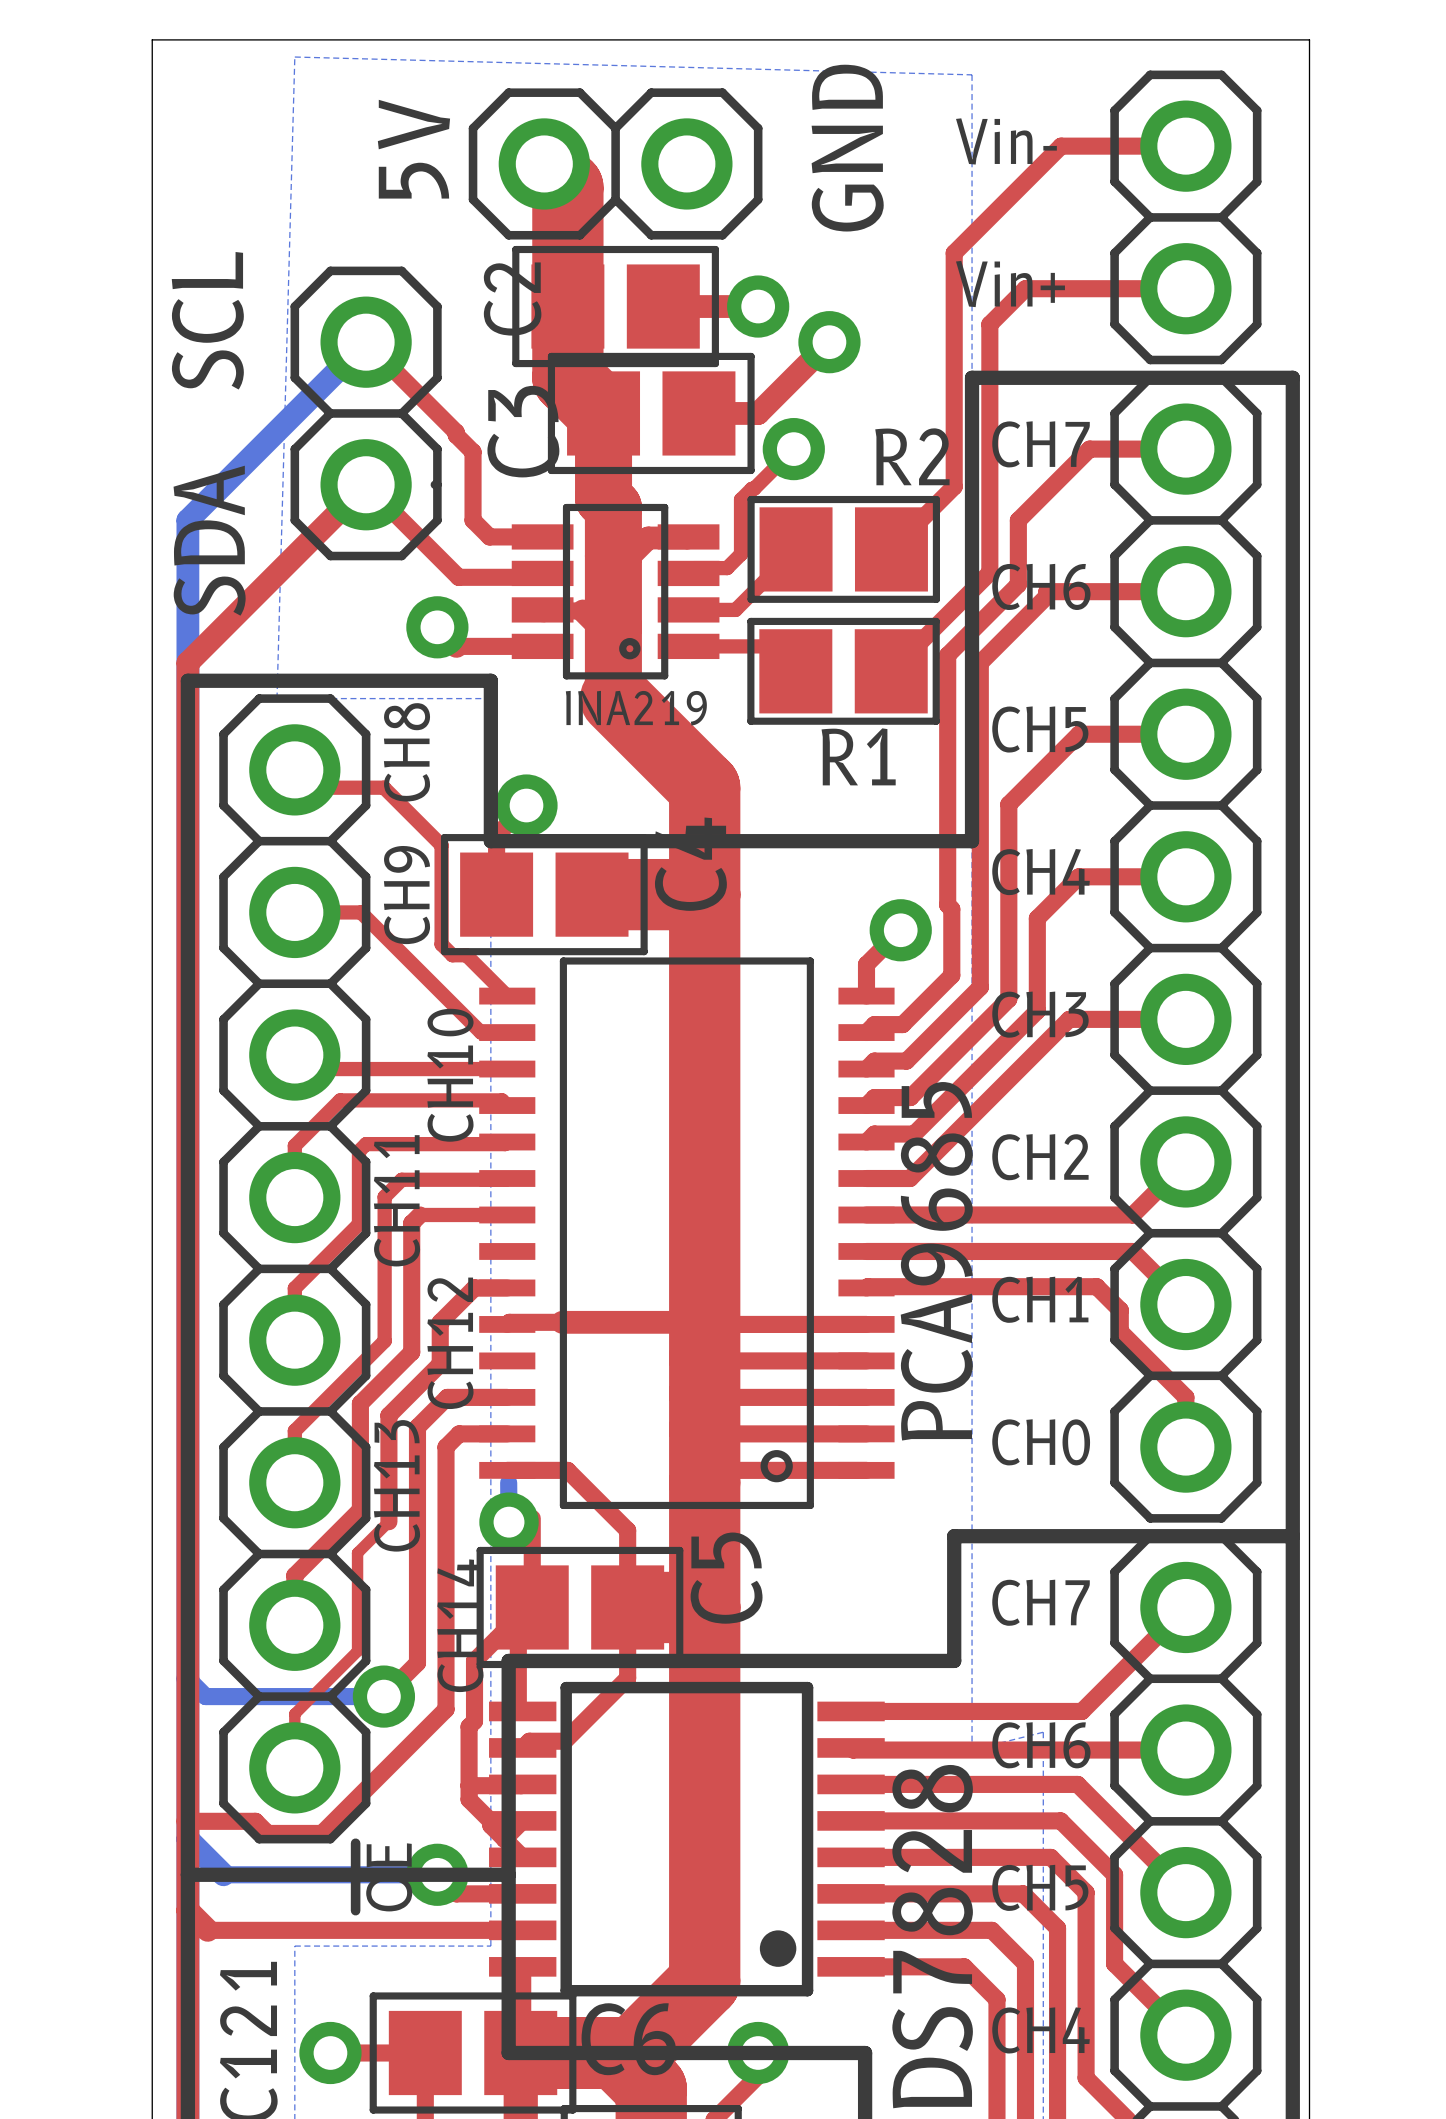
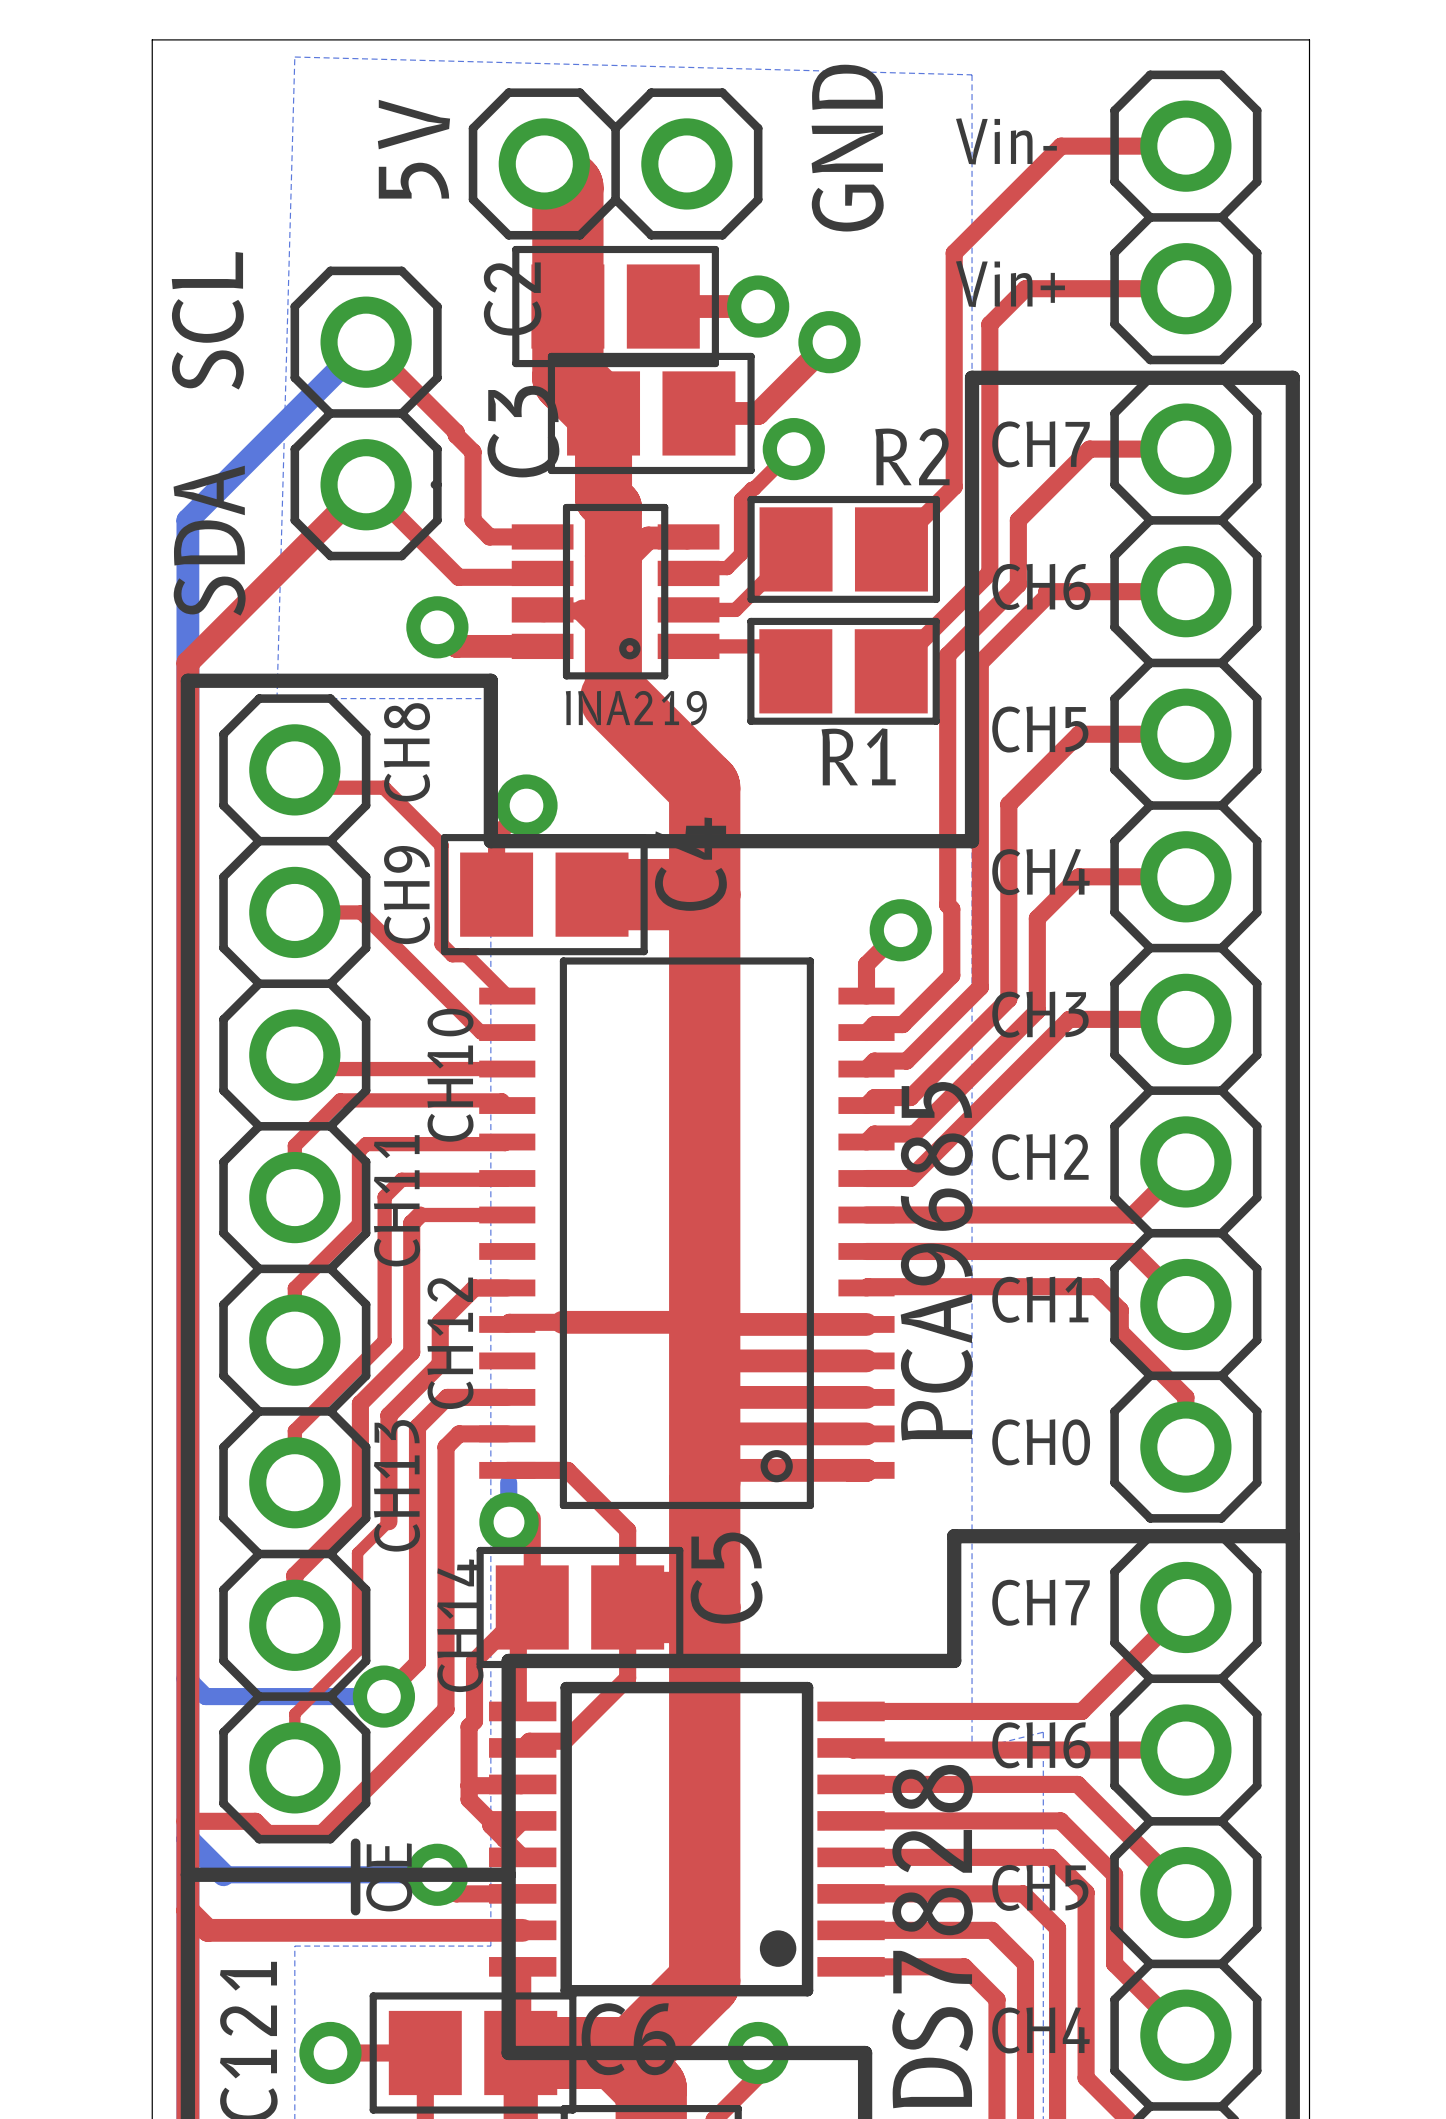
top track width: thin (456, 646) (542, 646) -> thick (456, 646) (542, 646)
top track width: thin (724, 1324) (866, 1324) -> thick (724, 1324) (866, 1324)
top track width: thin (707, 1360) (866, 1360) -> thick (707, 1360) (866, 1360)
top track width: thin (726, 1397) (866, 1397) -> thick (726, 1397) (866, 1397)
top track width: thin (709, 1433) (866, 1433) -> thick (709, 1433) (866, 1433)
top track width: thin (717, 1470) (866, 1470) -> thick (717, 1470) (866, 1470)
top track width: thin (207, 1930) (522, 1930) -> thick (207, 1930) (522, 1930)

